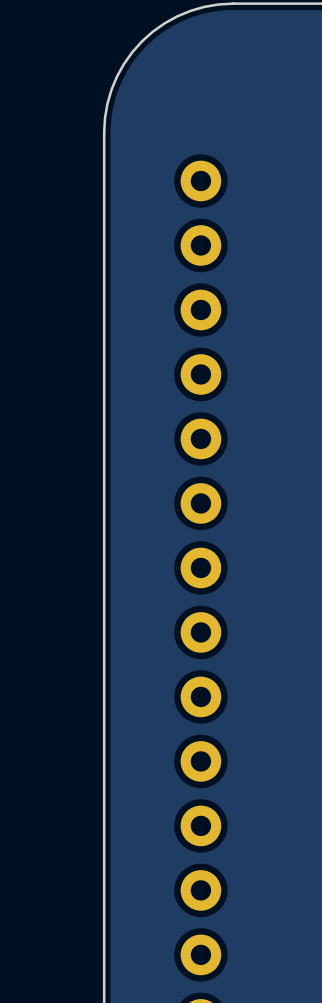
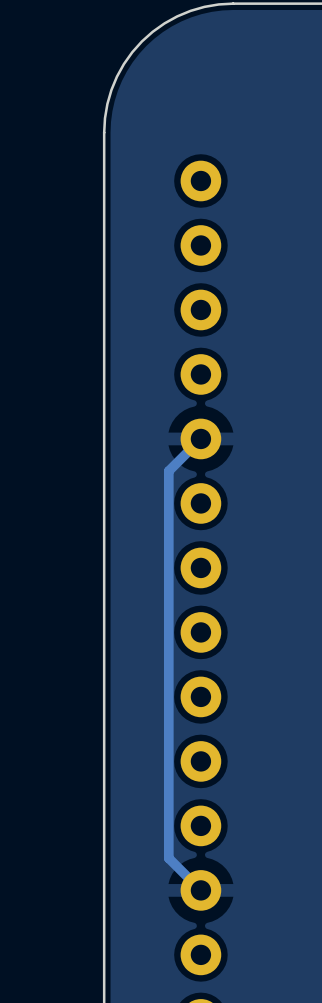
track: none -> (200, 438) (168, 471) (168, 858) (200, 890)

